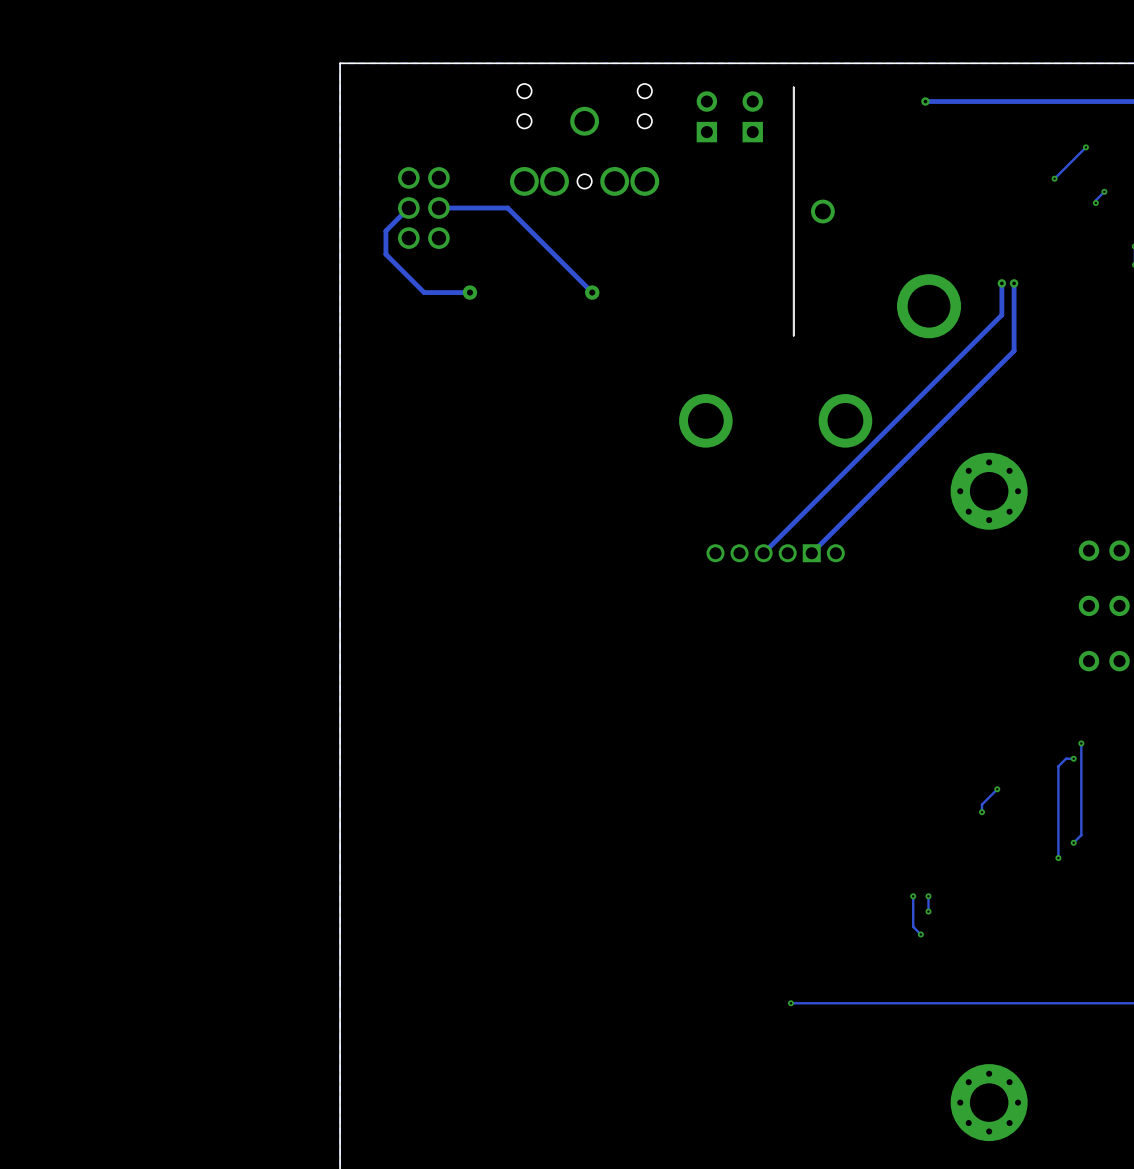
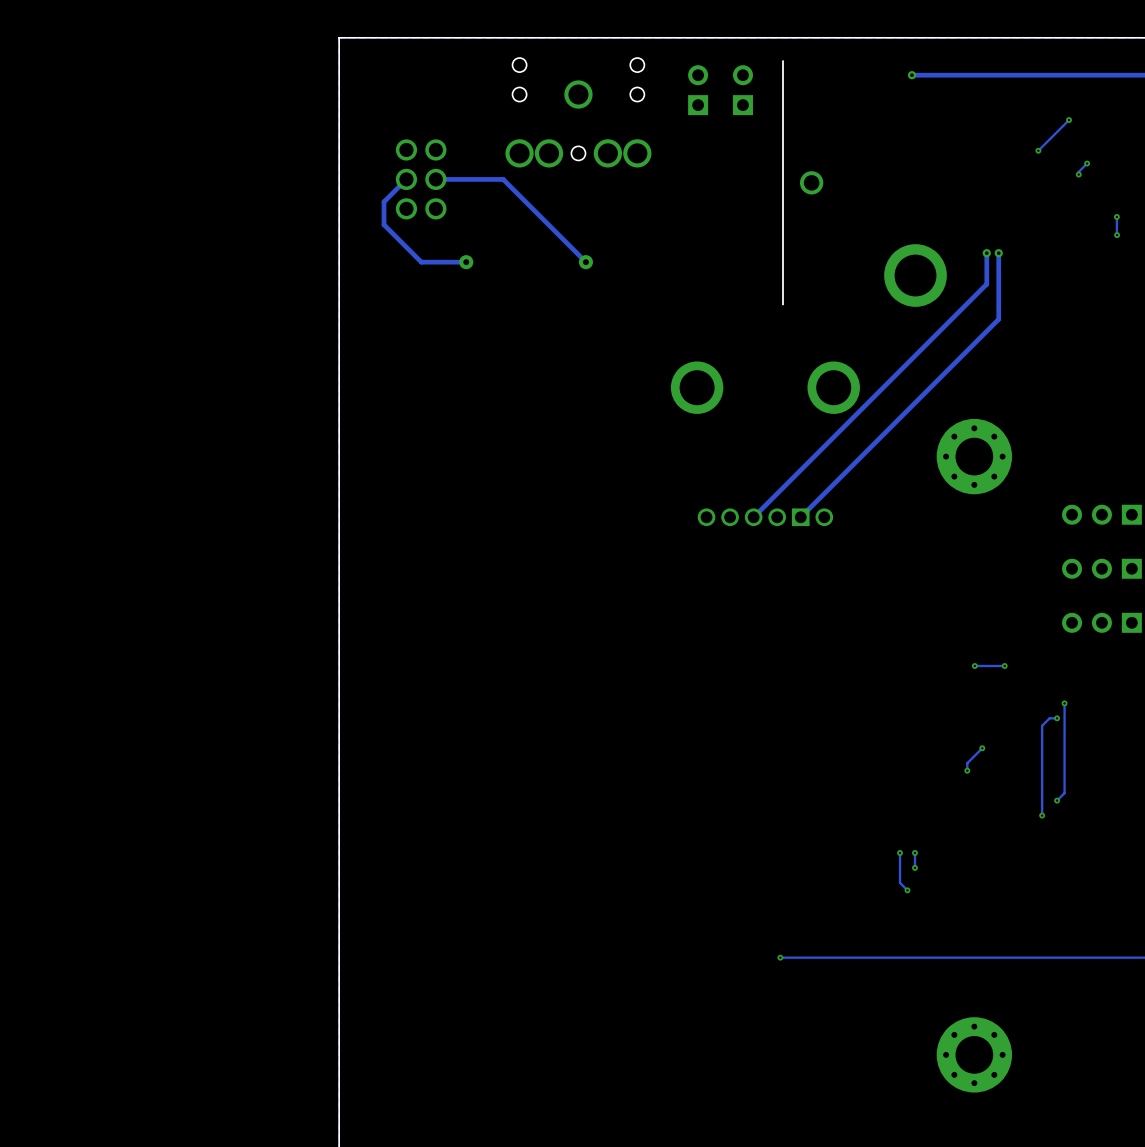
via: none -> (974, 666)
track: none -> (1004, 666) (974, 666)
via: none -> (1004, 666)

